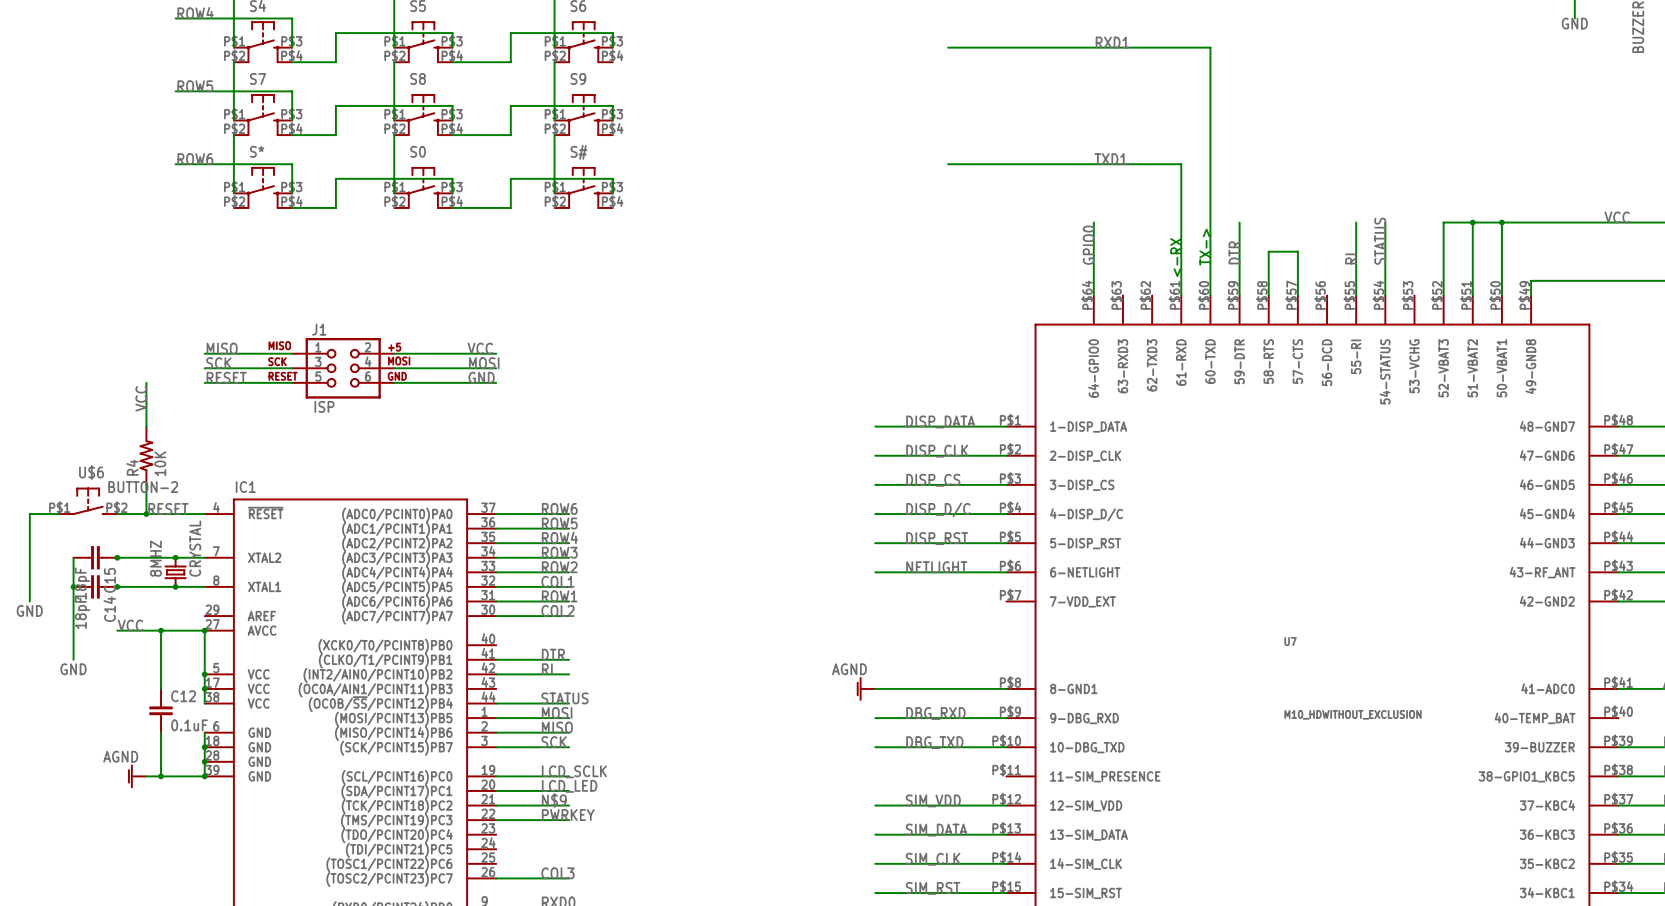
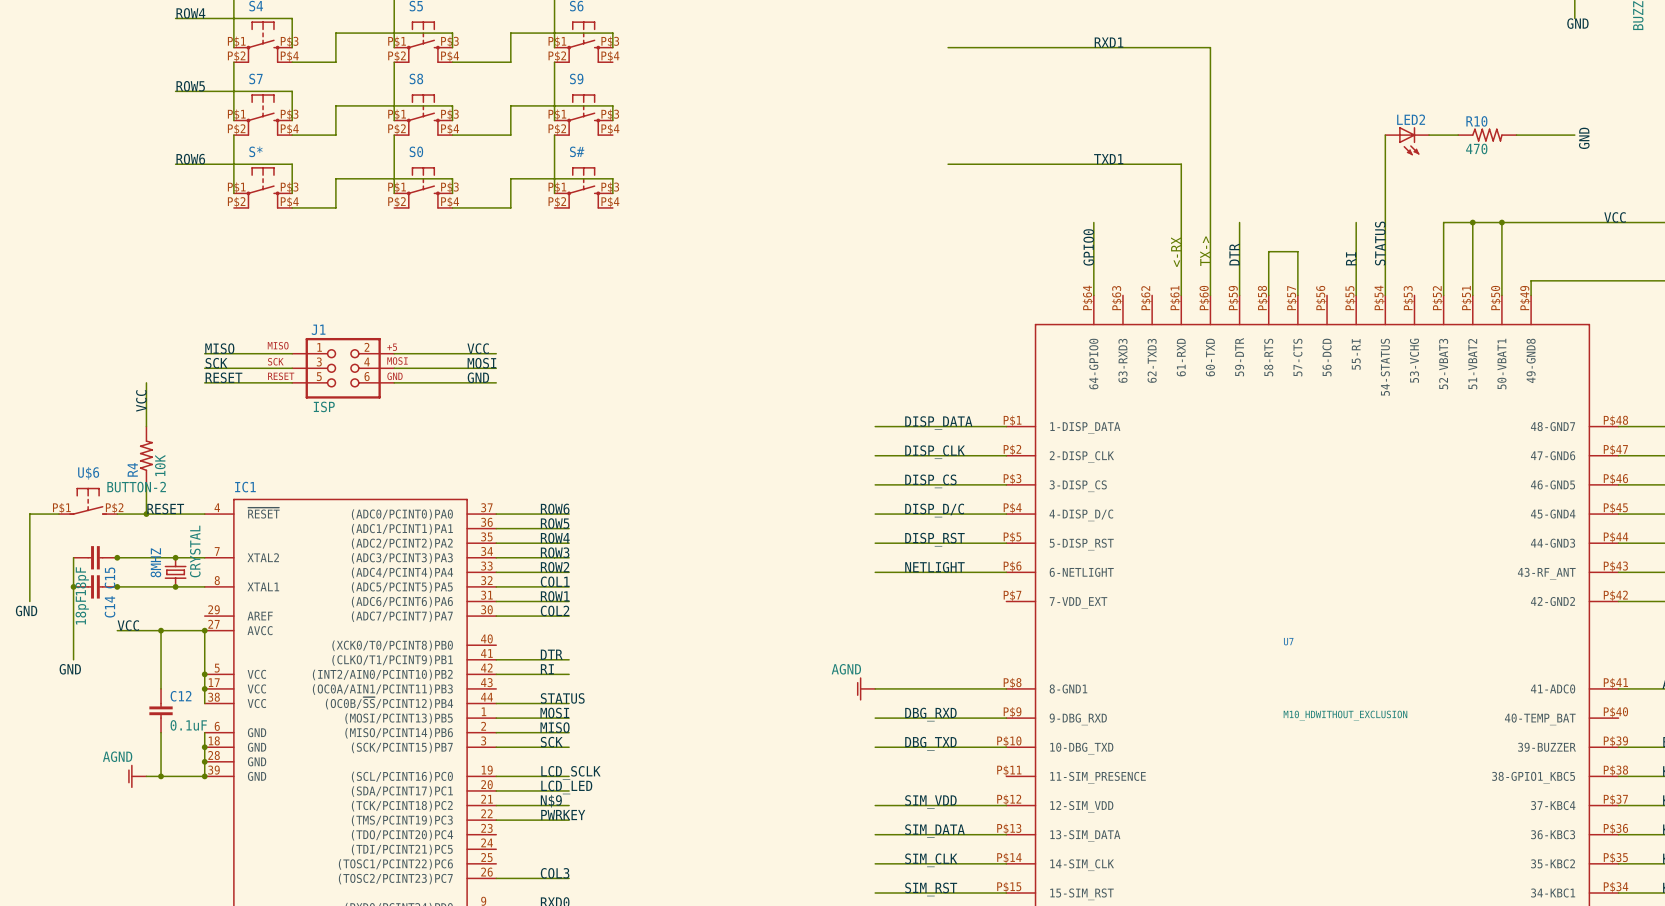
wire: none -> (1385, 135) (1385, 222)
wire: none -> (1429, 135) (1458, 135)
R10: none -> 470 (1487, 135)
wire: none -> (1516, 135) (1574, 135)
label: none -> GND (1584, 138)
LED2: none -> (1407, 141)

